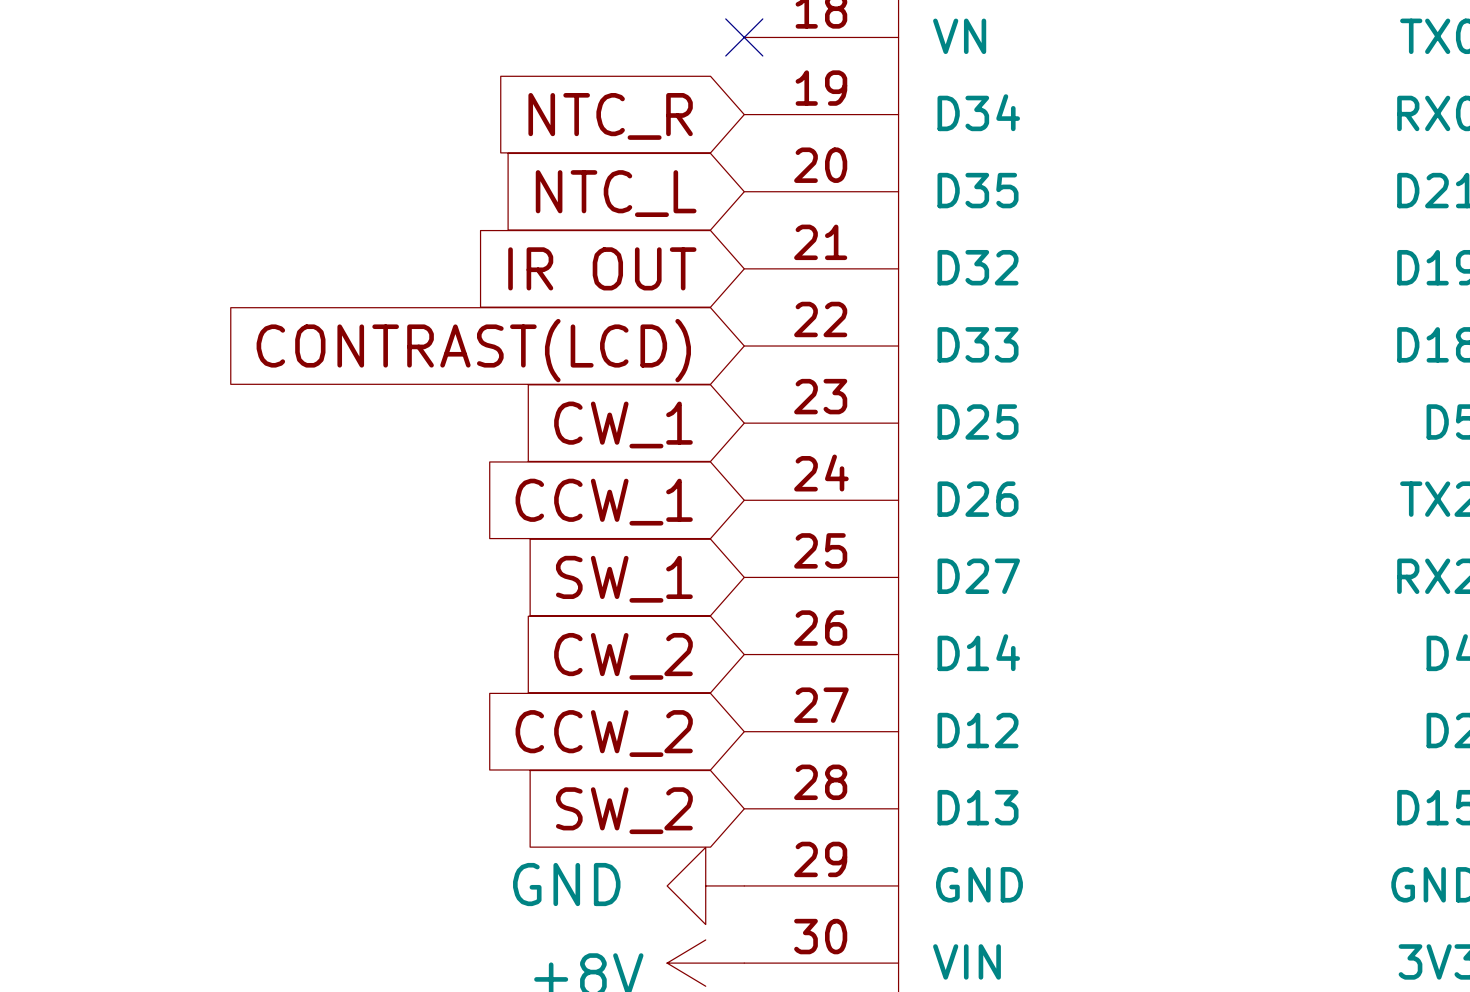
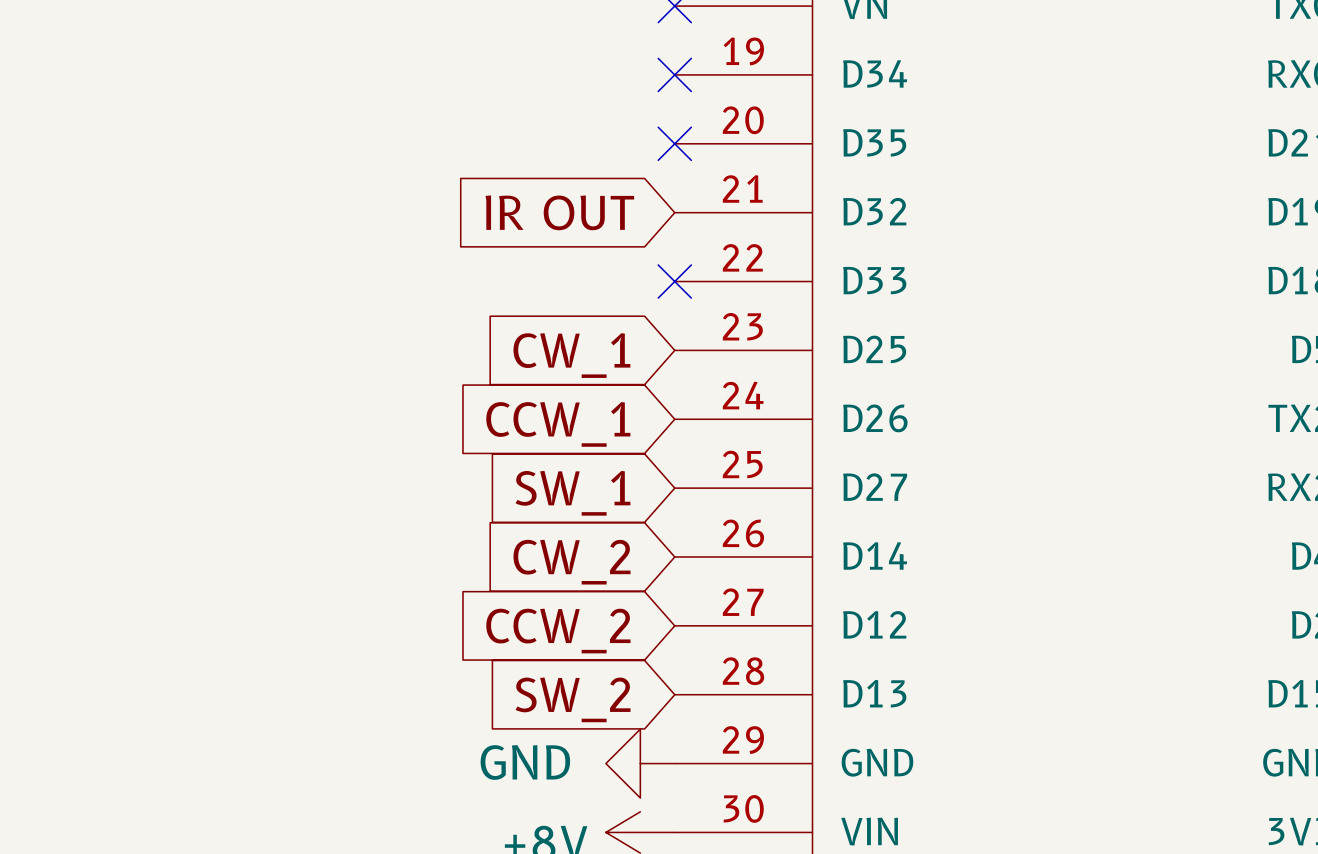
no-connect mark: none -> (674, 74)
global label: NTC_R (610, 116) -> none
no-connect mark: none -> (674, 143)
global label: NTC_L (616, 193) -> none
no-connect mark: none -> (674, 281)
global label: CONTRAST(LCD) (473, 350) -> none

